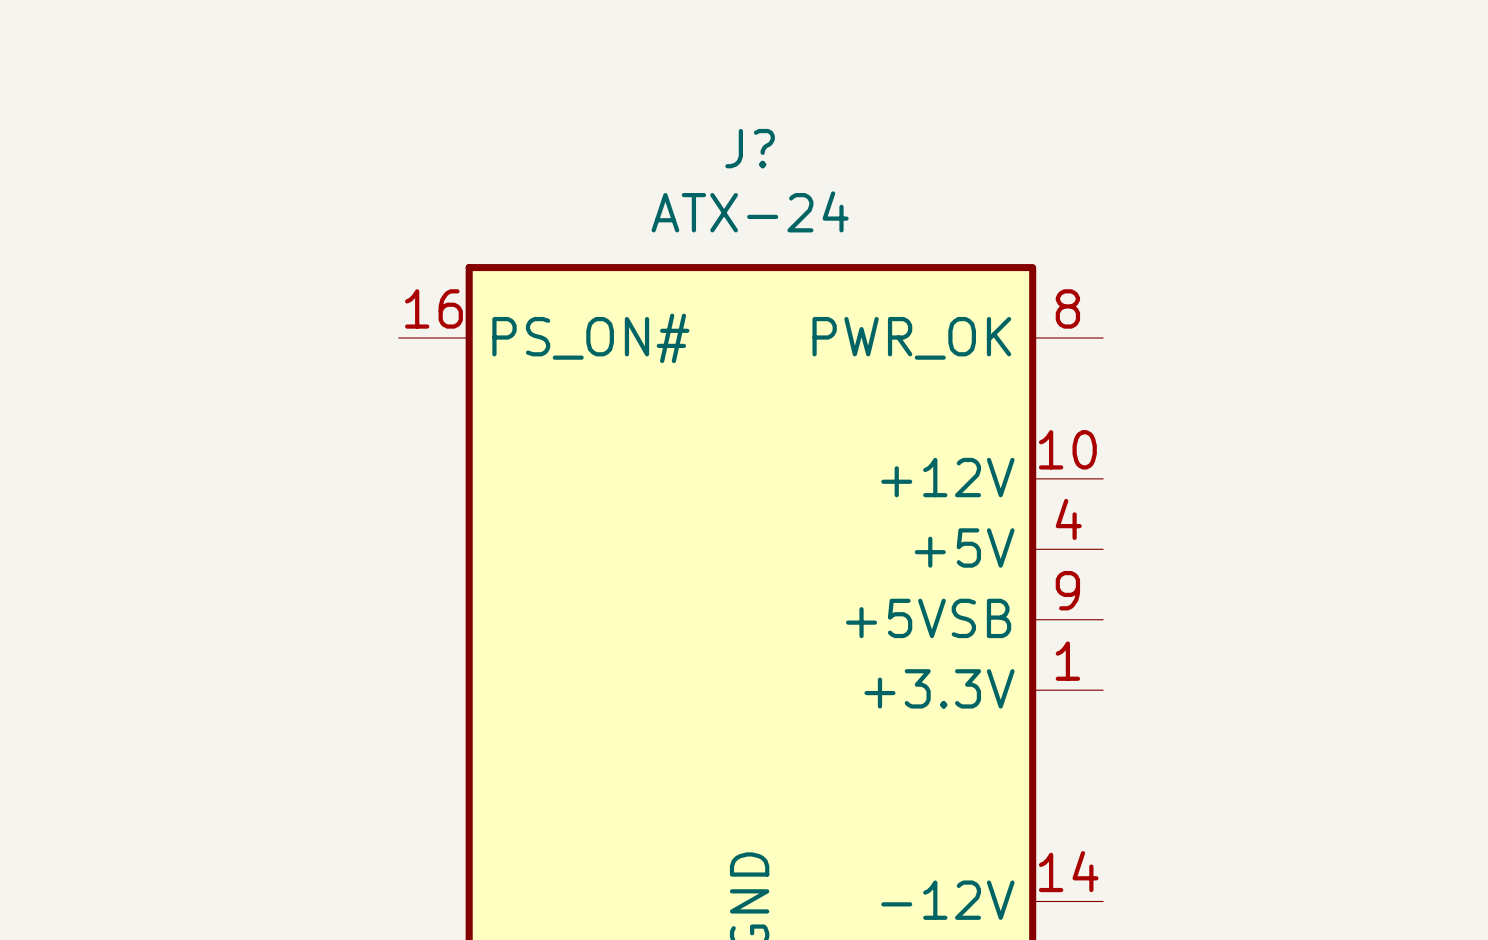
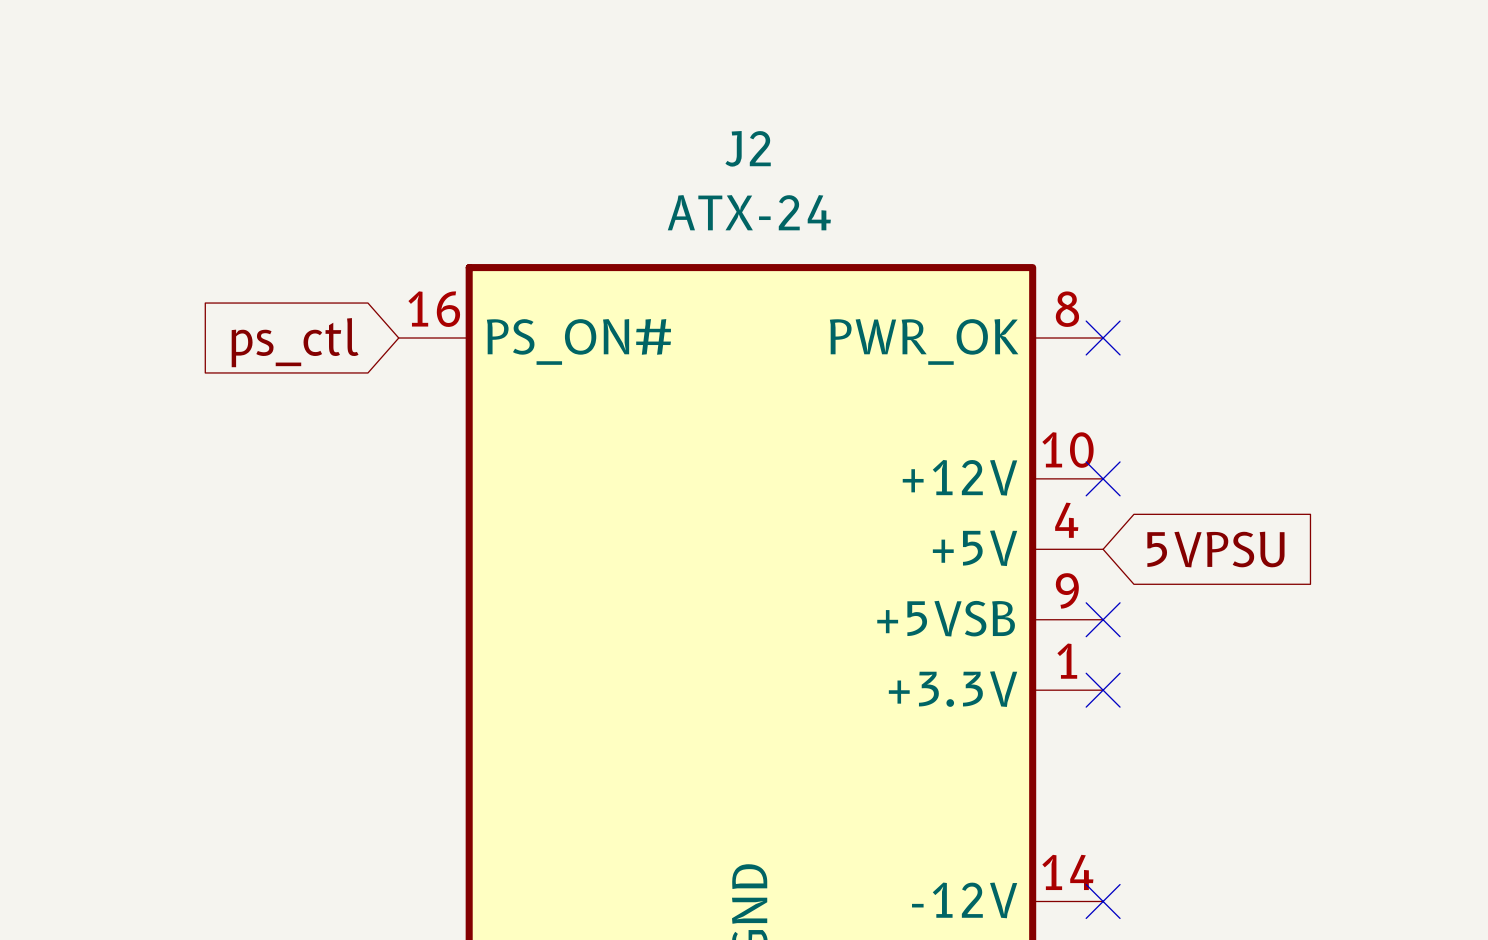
J? name: J? (750, 148) -> J2 (748, 148)
no-connect mark: none -> (1103, 338)
global label: none -> ps_ctl (295, 342)
no-connect mark: none -> (1103, 478)
global label: none -> 5VPSU (1215, 549)
no-connect mark: none -> (1103, 619)
no-connect mark: none -> (1103, 690)
no-connect mark: none -> (1103, 901)

